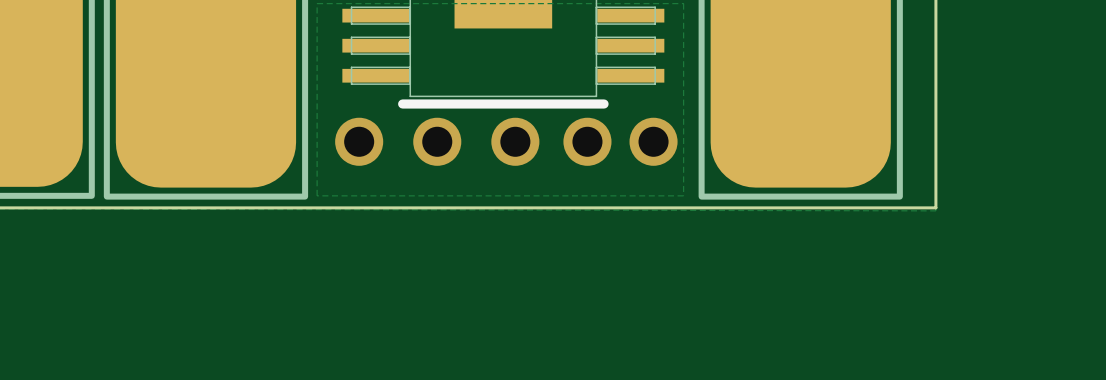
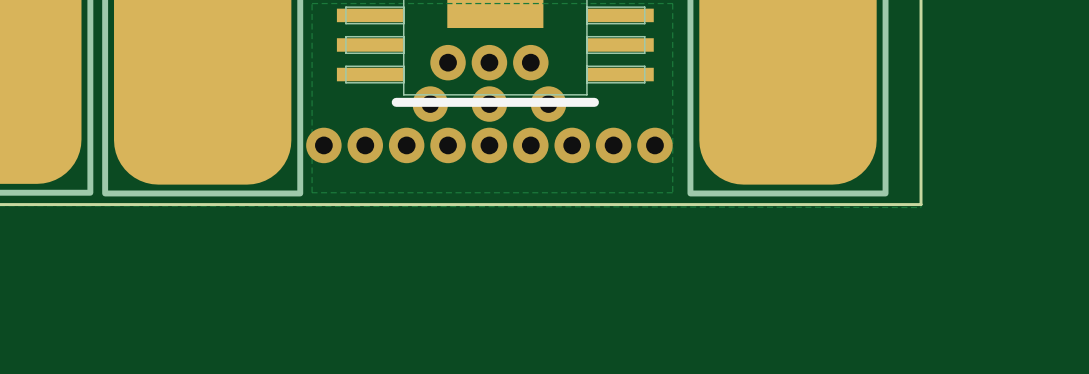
via: none -> (448, 62)
via: none -> (489, 62)
via: none -> (530, 62)
via: none -> (430, 104)
via: none -> (489, 104)
via: none -> (548, 104)
via size: [335, 117, 384, 166] -> [347, 127, 384, 164]
via size: [563, 117, 612, 166] -> [554, 127, 590, 164]
via size: [629, 117, 678, 166] -> [637, 127, 673, 164]
via: (437, 141) -> none
via: (515, 141) -> none
via: none -> (323, 145)
via: none -> (406, 145)
via: none -> (448, 145)
via: none -> (489, 145)
via: none -> (530, 145)
via: none -> (613, 145)

